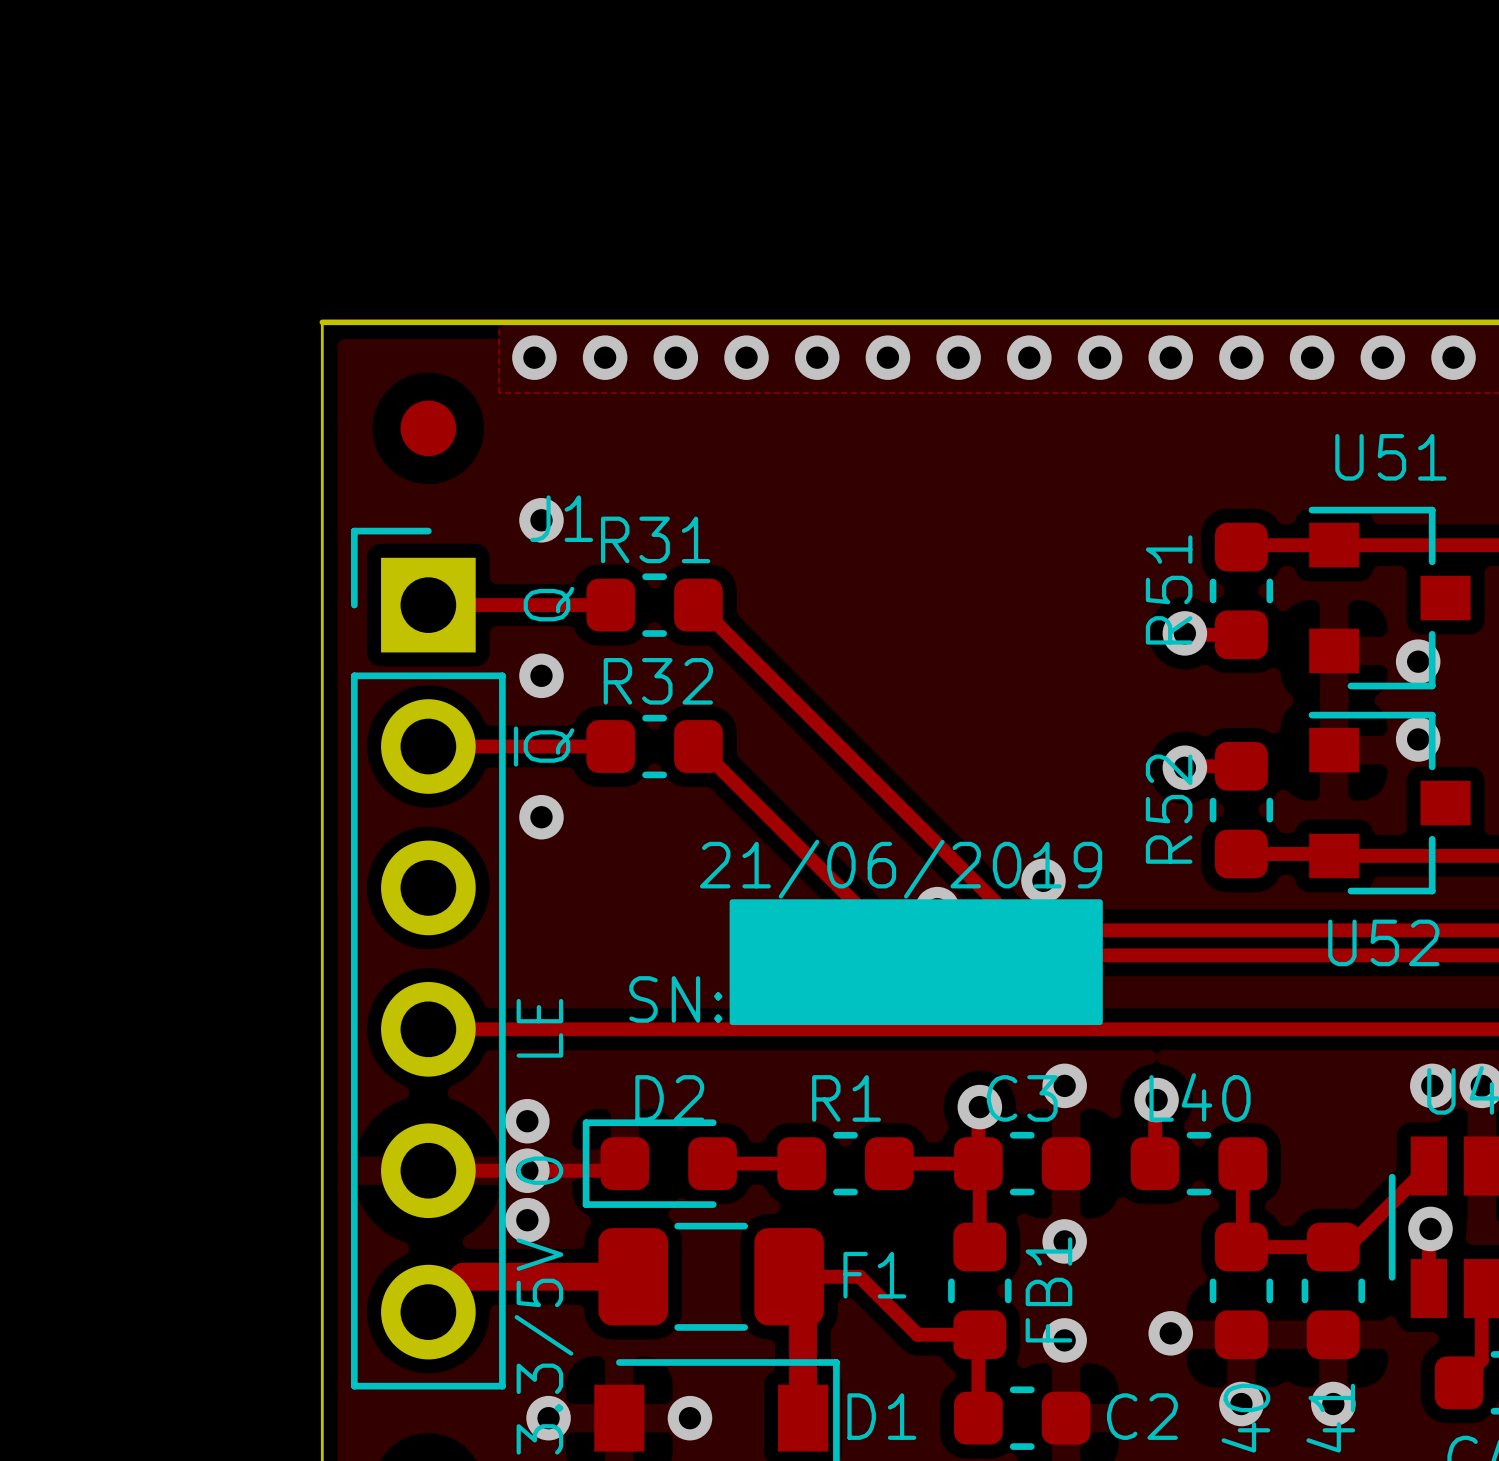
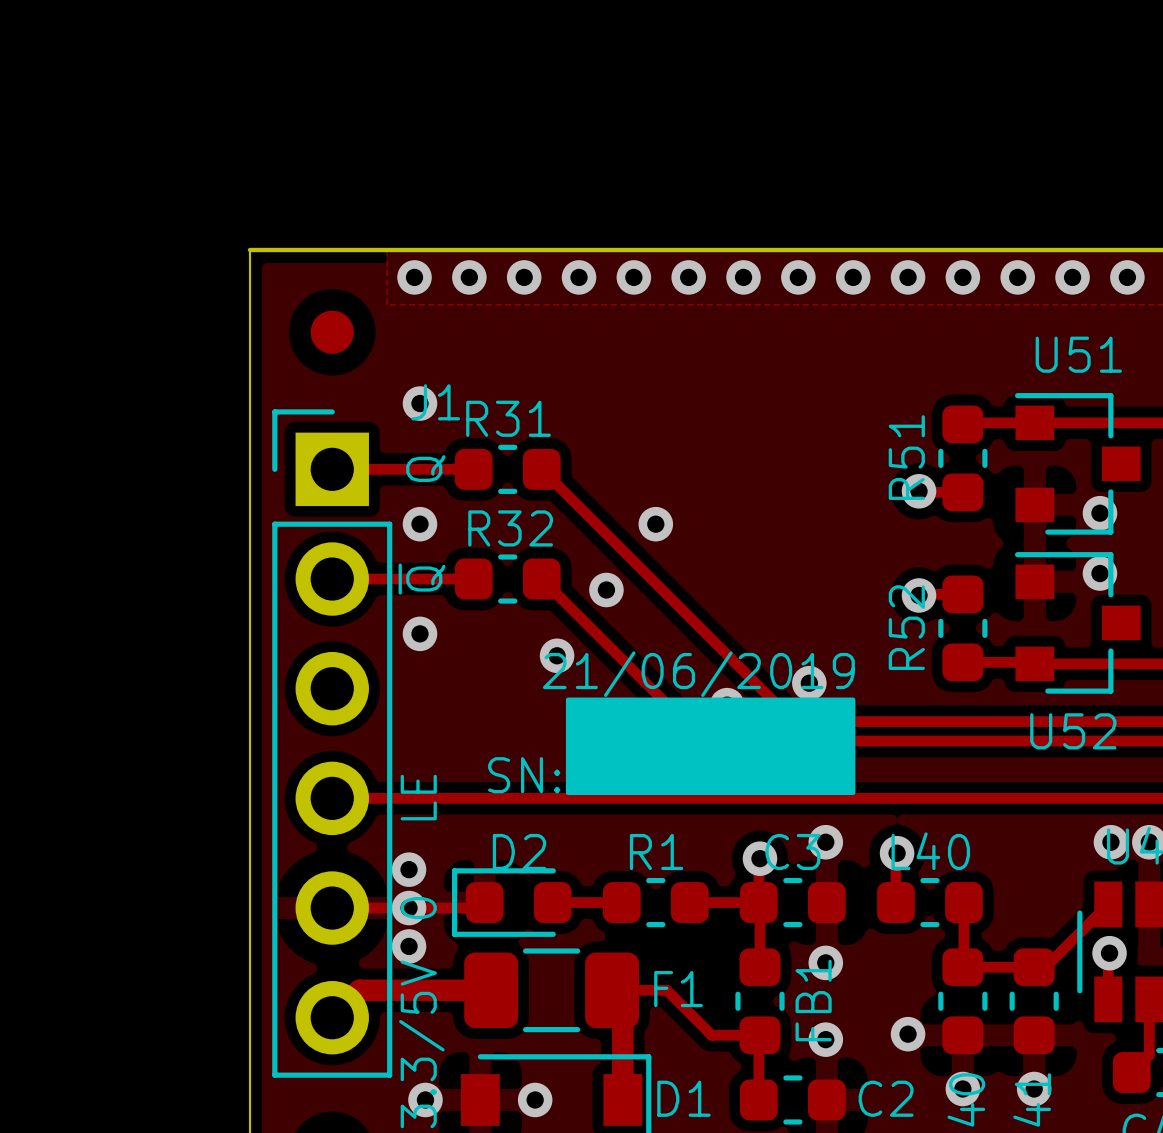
via: none -> (655, 524)
via: none -> (606, 589)
via: none -> (557, 655)

